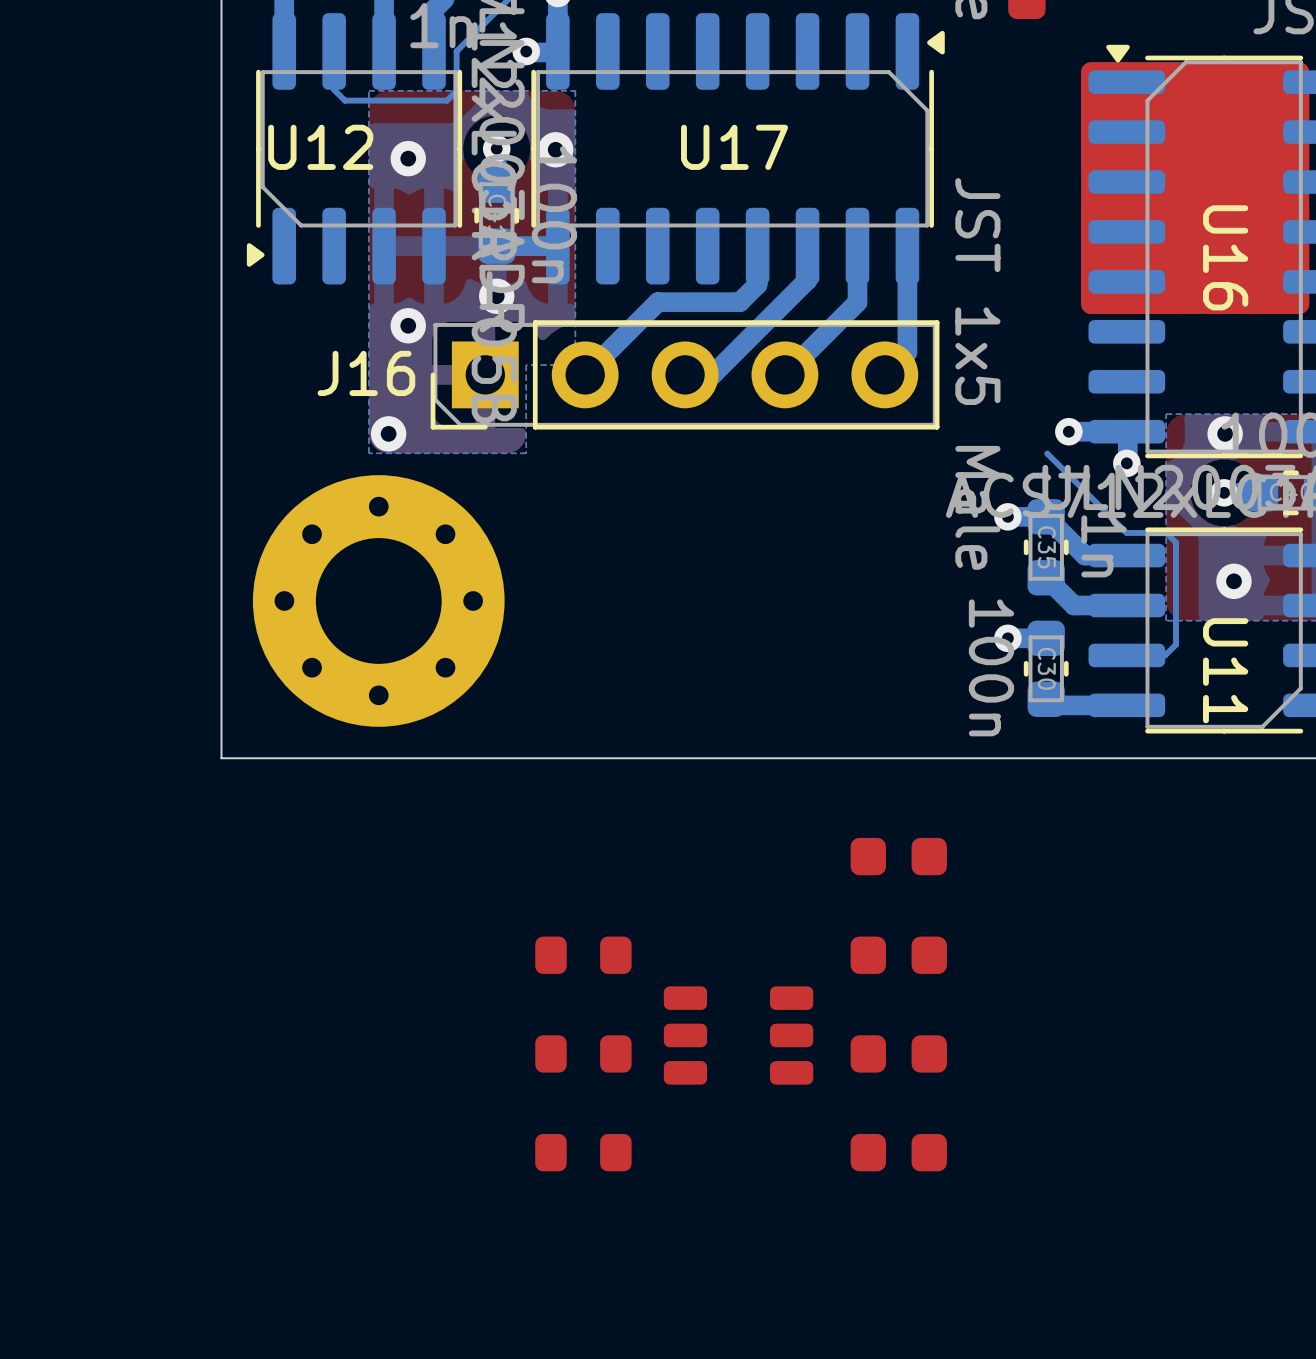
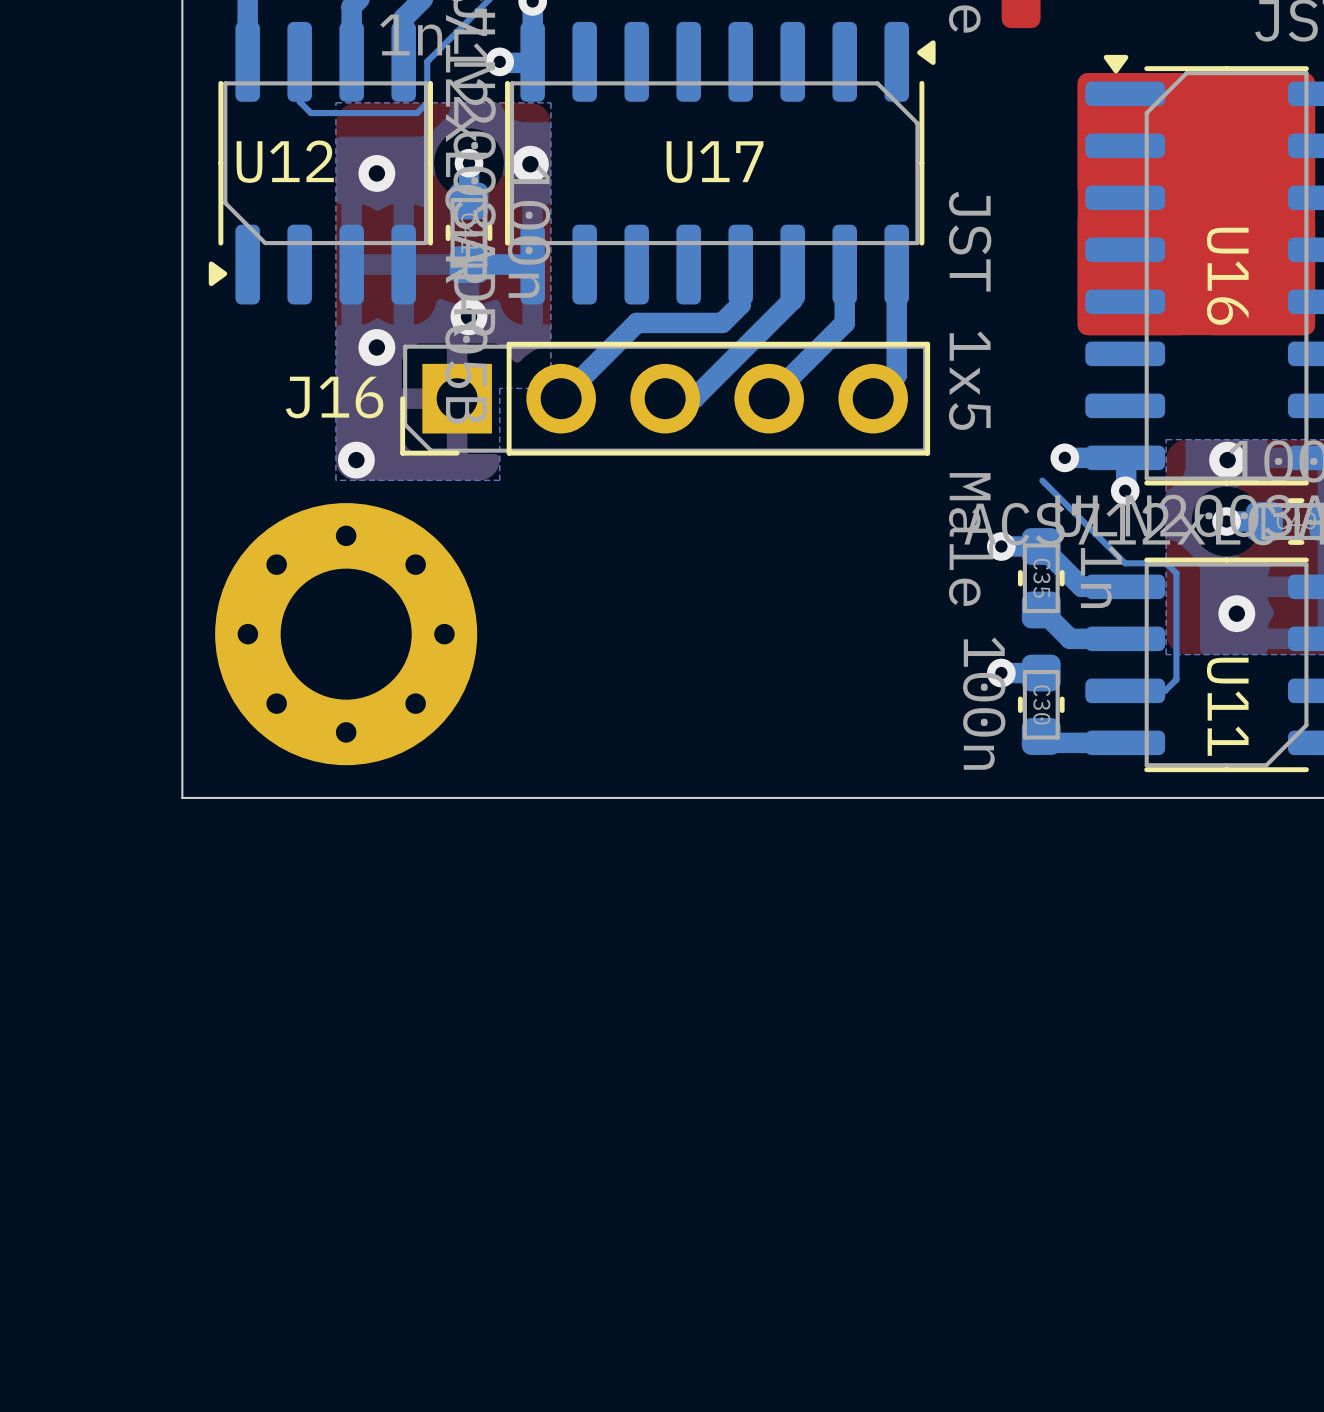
part: (898, 856) -> none
part: (583, 955) -> none
part: (898, 955) -> none
part: (738, 1035) -> none
part: (583, 1053) -> none
part: (898, 1053) -> none
part: (583, 1152) -> none
part: (898, 1152) -> none

